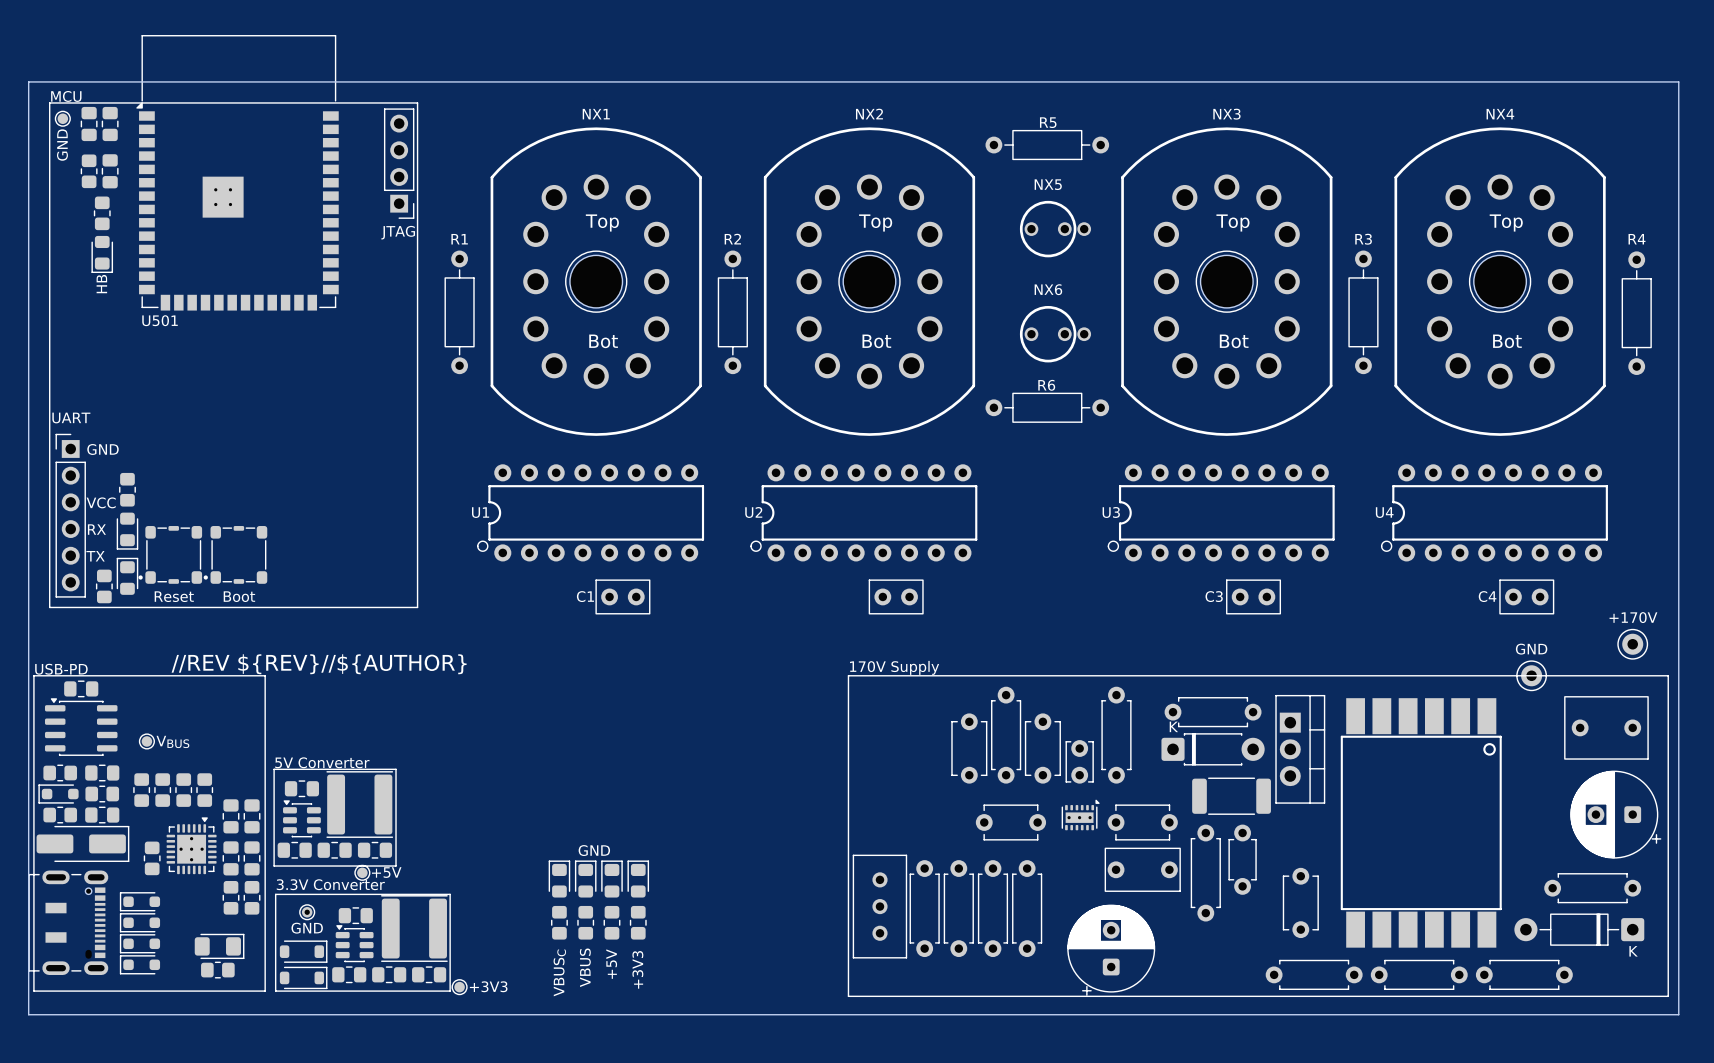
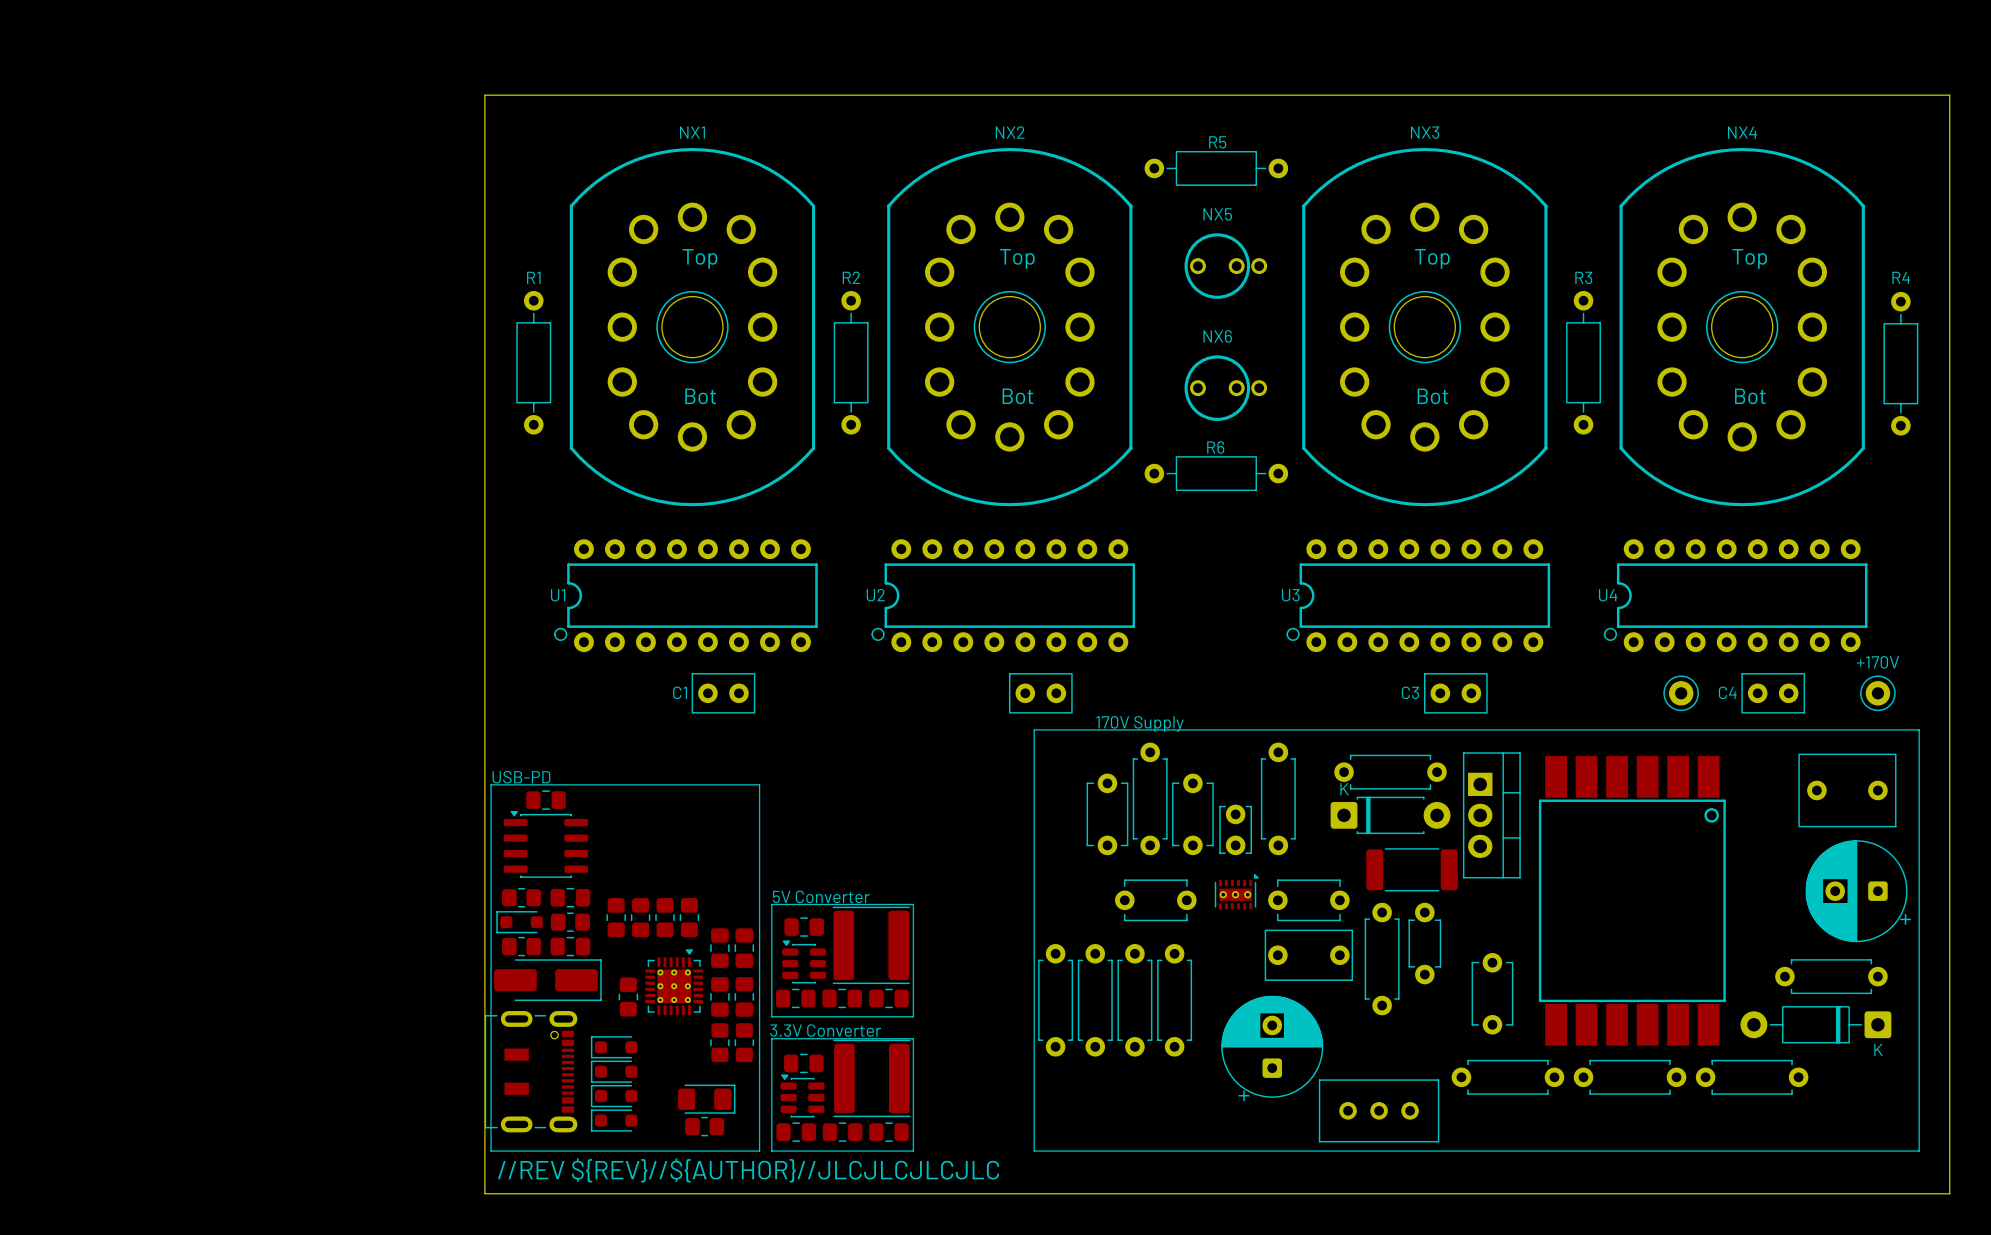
board edge: (417, 81) (28, 81) (28, 1014) (1678, 1014) -> (484, 95) (484, 1193) (1949, 1193) (1949, 1178)
text: MCU (66, 96) -> none
line: (49, 102) (417, 102) (417, 607) (49, 607) (49, 102) -> none
part: GND (62, 118) -> none
part: (89, 124) -> none
part: (110, 124) -> none
part: JTAG (399, 163) -> none
part: (89, 171) -> none
part: (110, 171) -> none
U501: (237, 172) -> none
part: (102, 213) -> none
part: HB (102, 254) -> none
text: GND (102, 449) -> none
part: (127, 489) -> none
text: VCC (101, 502) -> none
part: UART (70, 515) -> none
text: RX (96, 529) -> none
part: (127, 531) -> none
part: Reset (170, 554) -> none
part: Boot (235, 554) -> none
text: TX (95, 556) -> none
part: (127, 576) -> none
part: (104, 586) -> none
part: none -> (1681, 693)
part position: (1632, 644) -> (1877, 693)
text: //REV ${REV}//${AUTHOR} (319, 664) -> none
text position: 170V Supply (894, 667) -> 170V Supply (1139, 723)
text: USB-PD (61, 669) -> none
text: none -> USB-PD (521, 777)
line: (33, 675) (265, 675) (265, 991) (33, 991) (33, 675) -> none
line: (848, 675) (1668, 675) (1668, 996) (848, 996) (848, 675) -> (1034, 729) (1034, 1151) (1919, 1151) (1919, 729) (1034, 729)
part: GND (1531, 675) -> none
part: (81, 688) -> none
part: none -> (545, 800)
part: none -> (1107, 814)
part: none -> (1192, 814)
part: none -> (1390, 815)
part position: (1213, 712) -> (1390, 772)
part: (81, 727) -> none
part: none -> (545, 844)
part position: (1606, 727) -> (1847, 790)
part footprint: [1161, 733, 1265, 766] -> [1366, 848, 1458, 892]
part position: (1006, 735) -> (1150, 798)
part position: (1116, 735) -> (1278, 798)
part: VBUS (146, 741) -> none
part: (969, 748) -> none
part: (1042, 748) -> none
part position: (1300, 749) -> (1491, 815)
part position: (1079, 761) -> (1235, 829)
text: 5V Converter (322, 762) -> none
line: (274, 769) (396, 769) (396, 866) (274, 866) (274, 769) -> none
part: (60, 772) -> none
part: (102, 772) -> none
part: none -> (521, 897)
part: none -> (570, 897)
text: none -> 5V Converter (821, 896)
part: none -> (1155, 900)
part: none -> (1308, 900)
line: none -> (771, 904) (771, 1016) (913, 1016) (913, 904) (771, 904)
part: (301, 788) -> none
part: (141, 790) -> none
part: (162, 790) -> none
part: (183, 790) -> none
part: (204, 790) -> none
part: none -> (616, 917)
part: none -> (640, 917)
part: none -> (664, 917)
part: none -> (689, 917)
part: (58, 794) -> none
part: (102, 794) -> none
part: none -> (519, 922)
part: none -> (570, 922)
part: (1231, 796) -> none
part: none -> (804, 927)
part: (359, 804) -> none
part: none -> (871, 945)
part position: (1080, 814) -> (1236, 891)
part position: (1615, 814) -> (1858, 891)
part: (60, 815) -> none
part: (102, 815) -> none
part: none -> (521, 946)
part: none -> (570, 946)
part: (231, 816) -> none
part: (252, 816) -> none
part: none -> (719, 948)
part: none -> (744, 948)
part: (301, 818) -> none
part: (1010, 822) -> none
part: (1142, 822) -> none
part position: (1421, 822) -> (1632, 900)
part: none -> (804, 961)
part: none -> (1831, 976)
part: (82, 843) -> none
part: none -> (547, 980)
part: (191, 845) -> none
part: none -> (674, 982)
part: (294, 850) -> none
part: (334, 850) -> none
part: (374, 850) -> none
text: GND (594, 850) -> none
part: (152, 858) -> none
part: (231, 858) -> none
part: (252, 858) -> none
part: none -> (628, 996)
part: none -> (719, 996)
part: none -> (744, 996)
part: none -> (795, 998)
part: none -> (842, 998)
part: none -> (888, 998)
part position: (1242, 859) -> (1424, 943)
part: none -> (1055, 1000)
part: none -> (1095, 1000)
part: none -> (1134, 1000)
part: none -> (1174, 1000)
part position: (1142, 869) -> (1308, 955)
part: +5V (362, 872) -> none
part position: (1205, 873) -> (1382, 959)
part: VBUSC (559, 879) -> none
part: VBUS (585, 879) -> none
part: +5V (611, 879) -> none
part: +3V3 (638, 879) -> none
text: 3.3V Converter (330, 884) -> none
text: none -> 3.3V Converter (825, 1030)
part: (1592, 888) -> none
line: none -> (771, 1038) (913, 1038) (913, 1151) (771, 1151) (771, 1038)
part: (231, 897) -> none
part: (252, 897) -> none
part: none -> (719, 1042)
part: none -> (744, 1042)
part: (139, 901) -> none
part: none -> (614, 1047)
part position: (1300, 902) -> (1492, 993)
part: (879, 906) -> none
part: (924, 908) -> none
part: (958, 908) -> none
part: (992, 908) -> none
part: (1027, 908) -> none
part: GND (307, 912) -> none
part: (355, 915) -> none
part: none -> (803, 1063)
part: (68, 922) -> none
part: (139, 922) -> none
part: none -> (531, 1071)
part: none -> (614, 1071)
part: (559, 922) -> none
part: (585, 922) -> none
part: (611, 922) -> none
part: (638, 922) -> none
part: none -> (1752, 1077)
part: (414, 928) -> none
part: none -> (871, 1078)
part position: (1579, 929) -> (1815, 1024)
part: (139, 943) -> none
part: (354, 943) -> none
part: none -> (614, 1096)
part: none -> (802, 1095)
part: (219, 946) -> none
part: none -> (706, 1099)
part position: (1111, 950) -> (1272, 1048)
part: (303, 951) -> none
part: none -> (1379, 1110)
part: (139, 964) -> none
part: none -> (614, 1120)
part: (217, 970) -> none
part: none -> (704, 1126)
part: (349, 974) -> none
part: (389, 974) -> none
part: (429, 974) -> none
part: none -> (796, 1132)
part: none -> (842, 1132)
part: none -> (888, 1132)
part position: (1314, 974) -> (1507, 1077)
part position: (1419, 974) -> (1630, 1077)
part: (1524, 974) -> none
part: (303, 977) -> none
part: +3V3 (459, 987) -> none
line: (422, 991) (275, 991) (275, 894) (450, 894) (450, 991) -> (491, 1151) (491, 784) (759, 784) (759, 1151) (522, 1151)
text: none -> //REV ${REV}//${AUTHOR}//JLCJLCJLCJLC (748, 1170)

